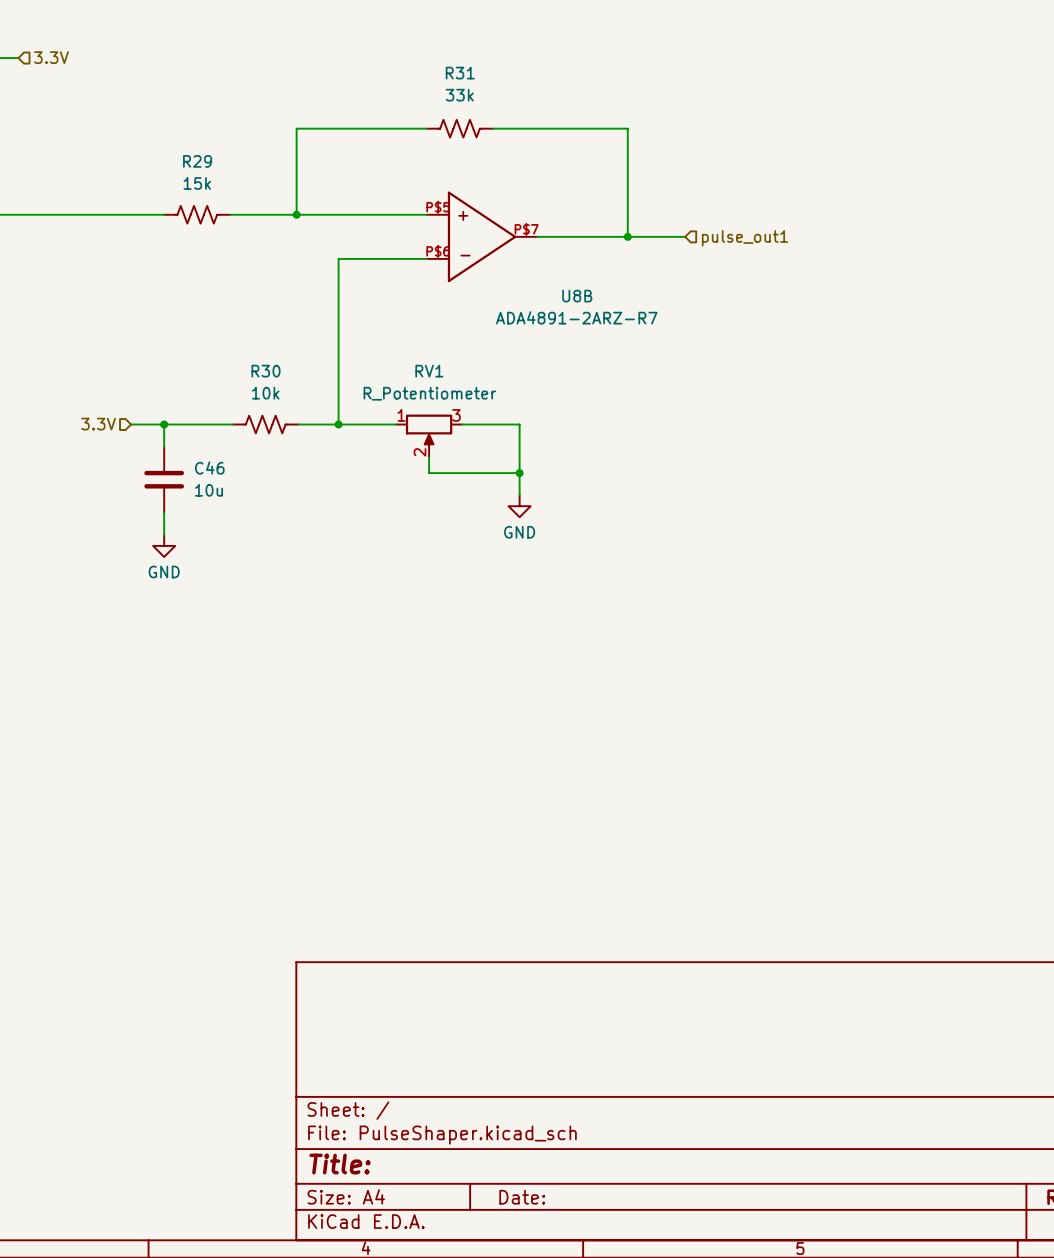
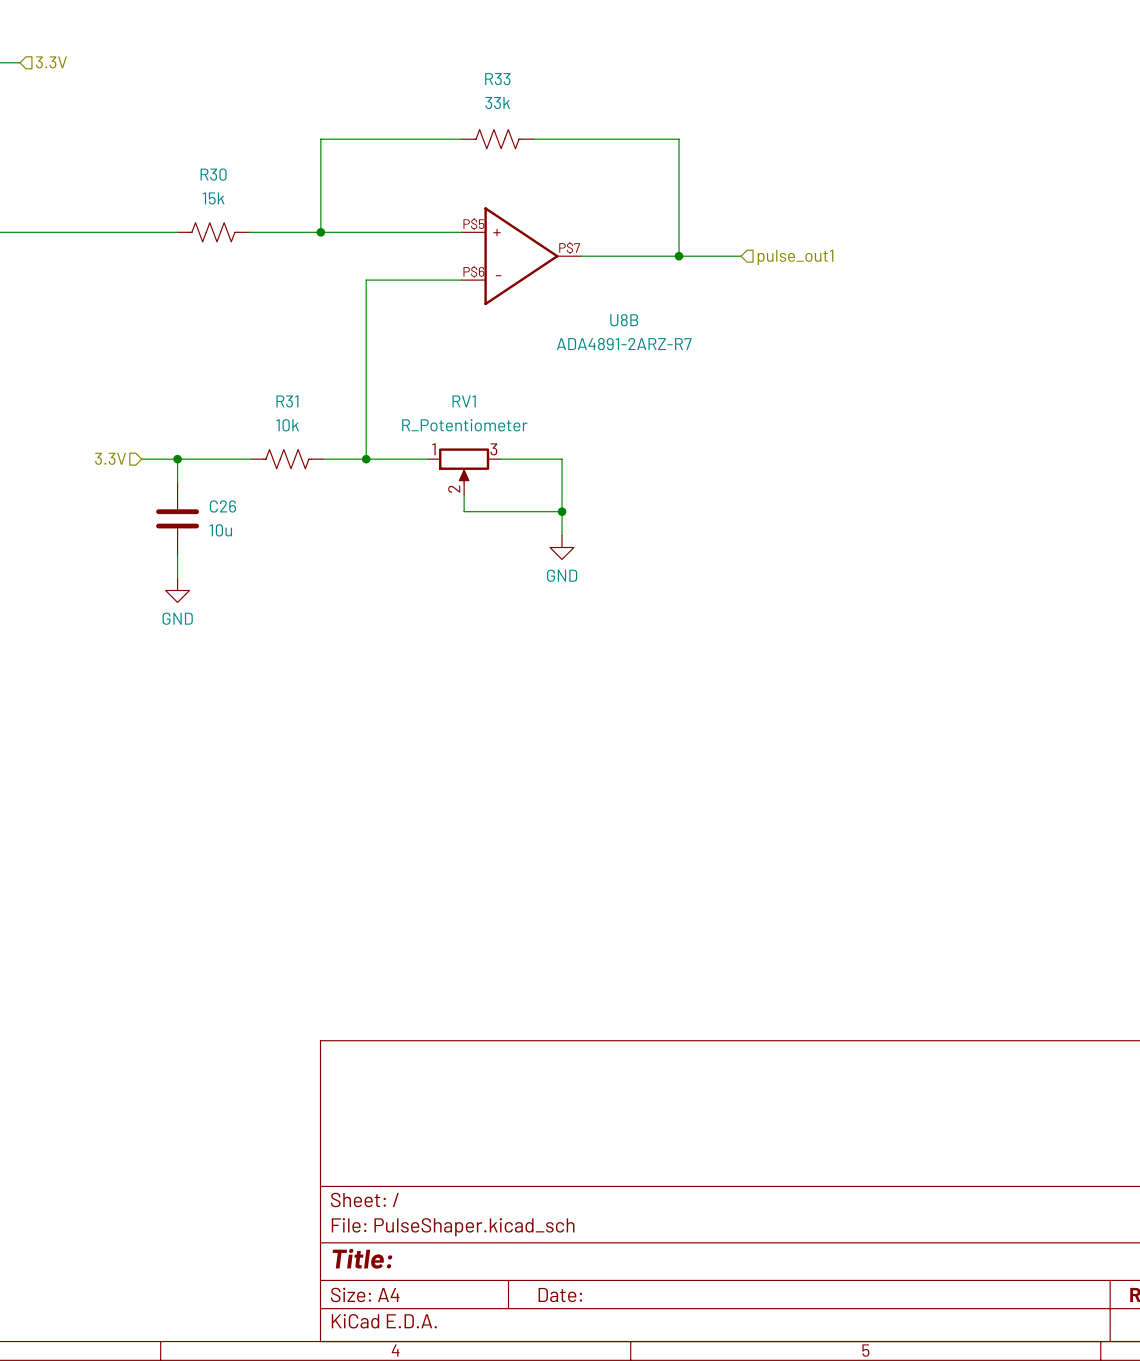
R31 name: R31 (460, 73) -> R33 (497, 79)
R29 name: R29 (197, 161) -> R30 (213, 174)
R30 name: R30 (265, 371) -> R31 (287, 401)
C46 name: C46 (209, 467) -> C26 (222, 506)

